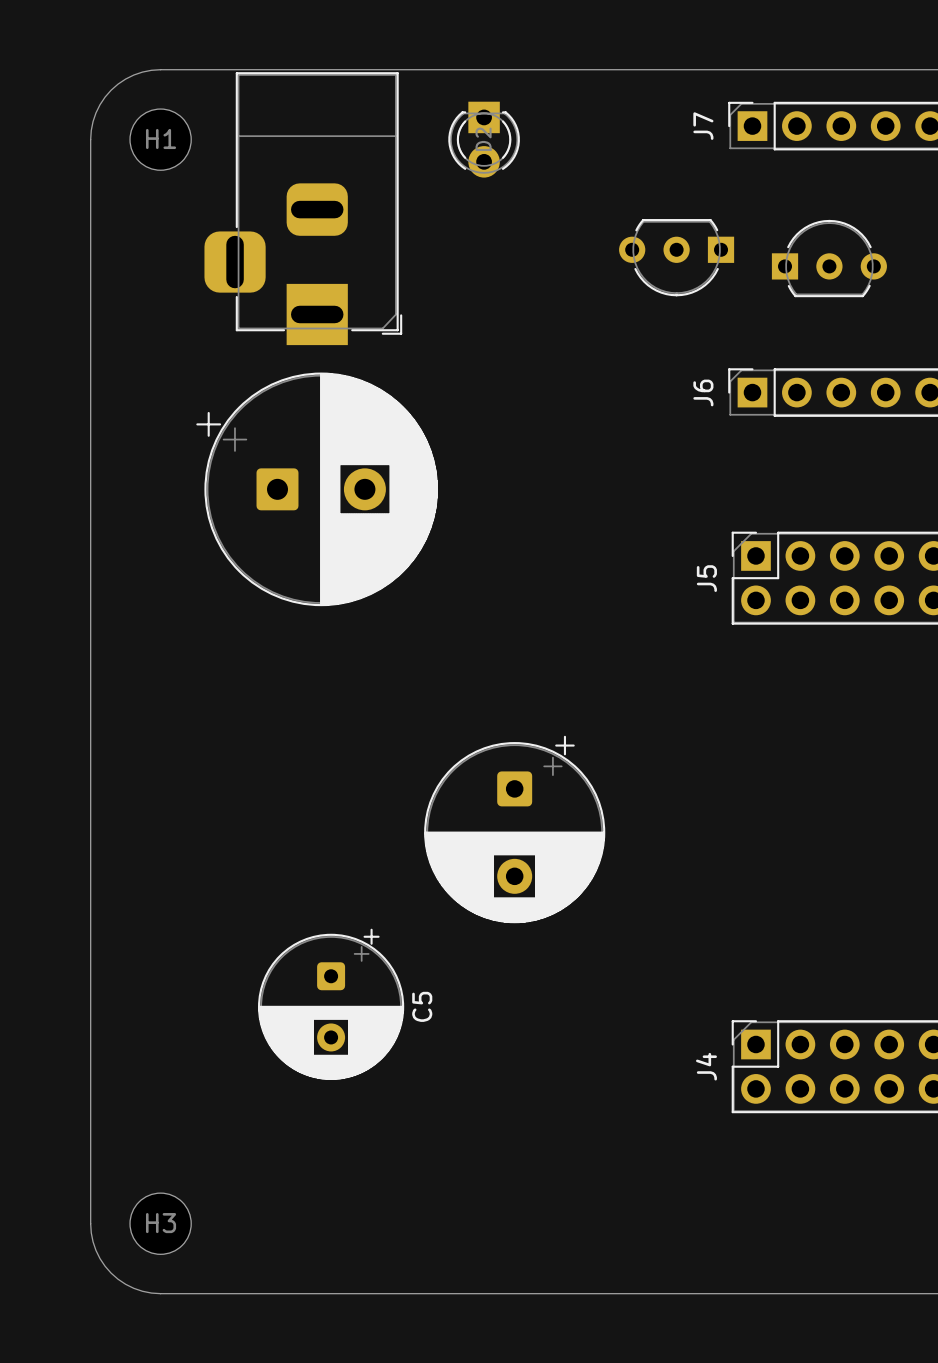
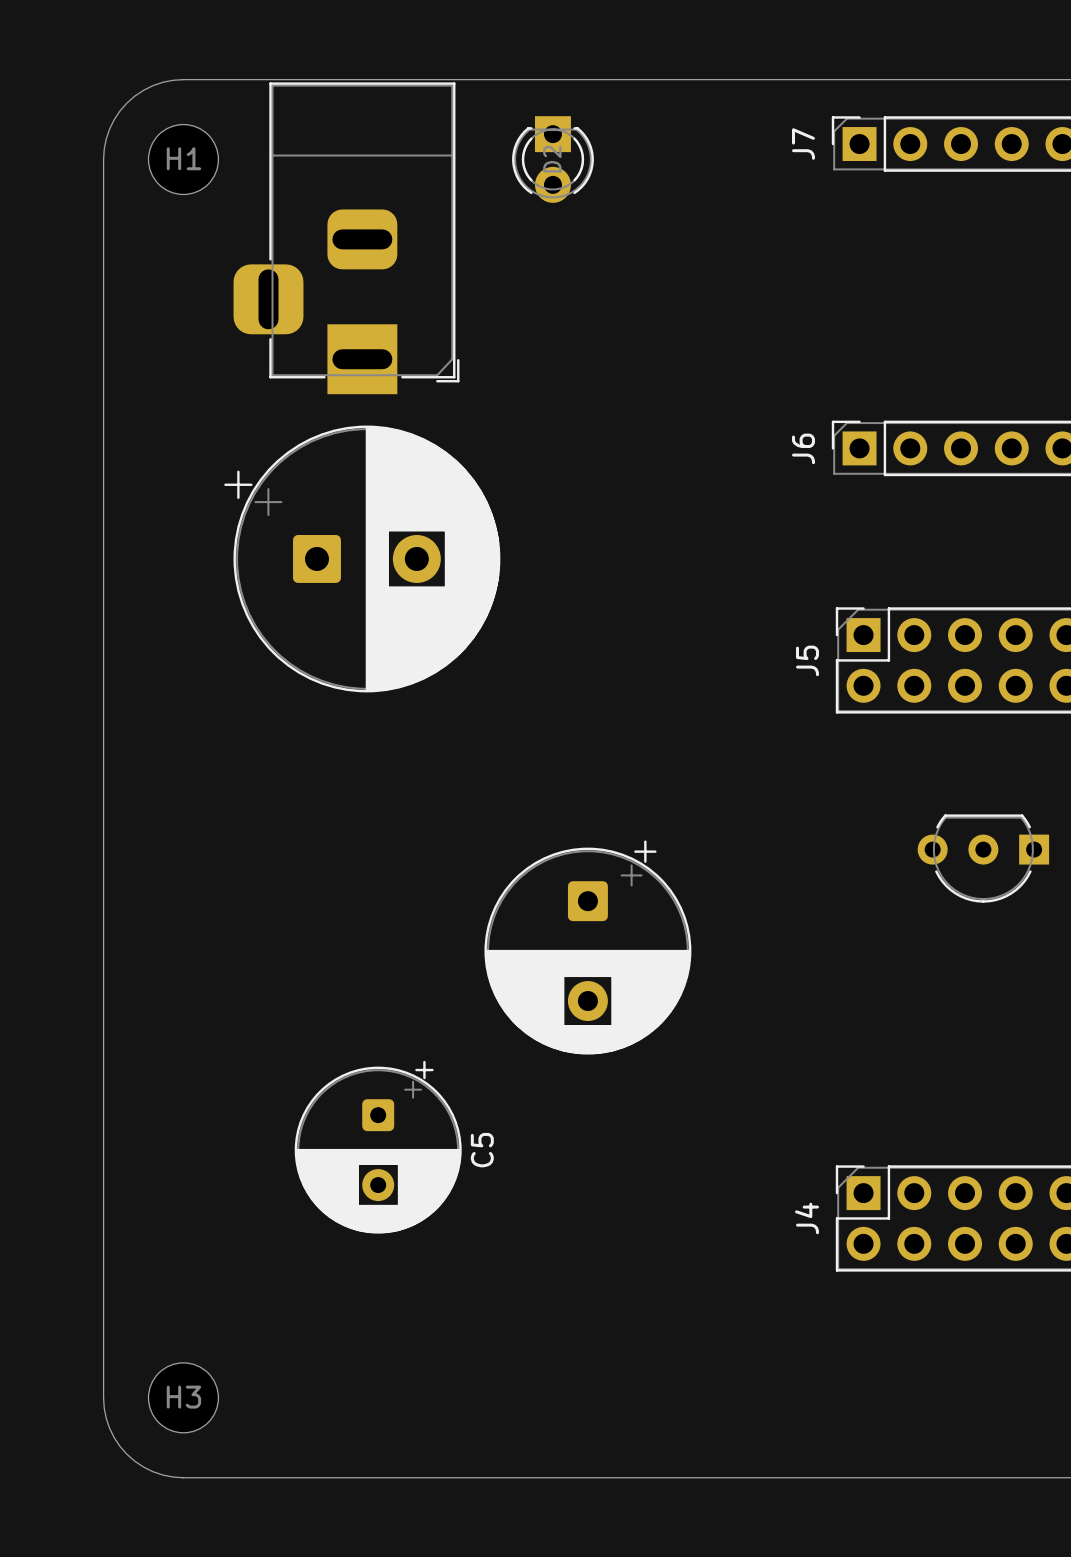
part: (676, 257) -> none
part: (829, 258) -> none
part: none -> (983, 858)

